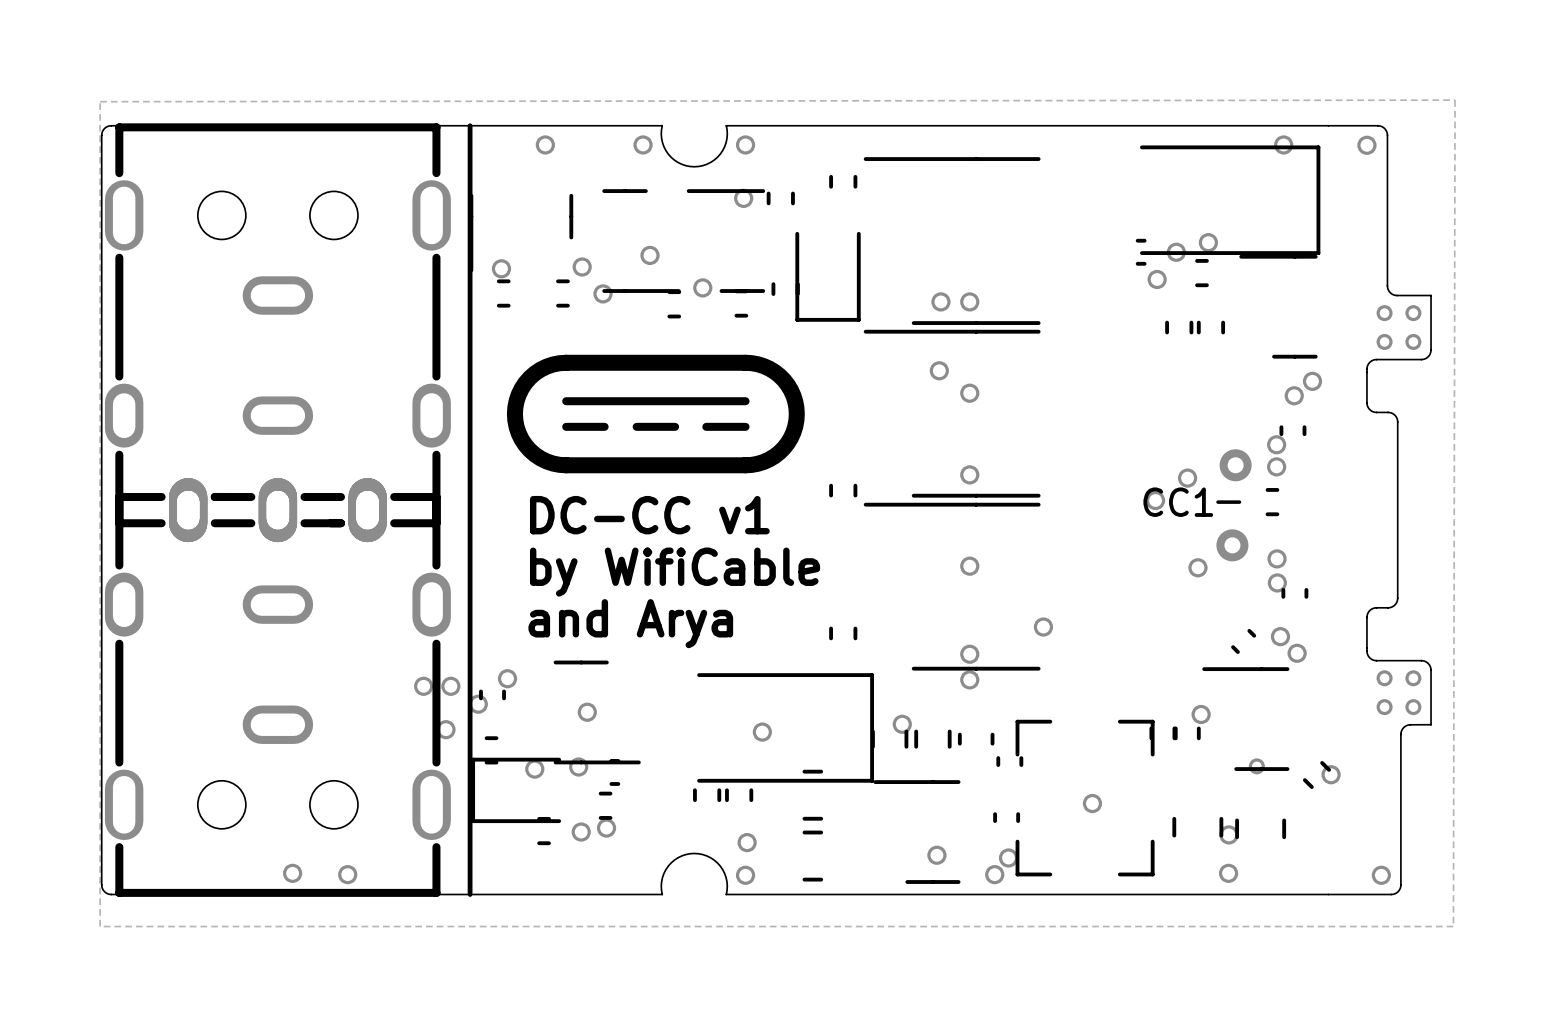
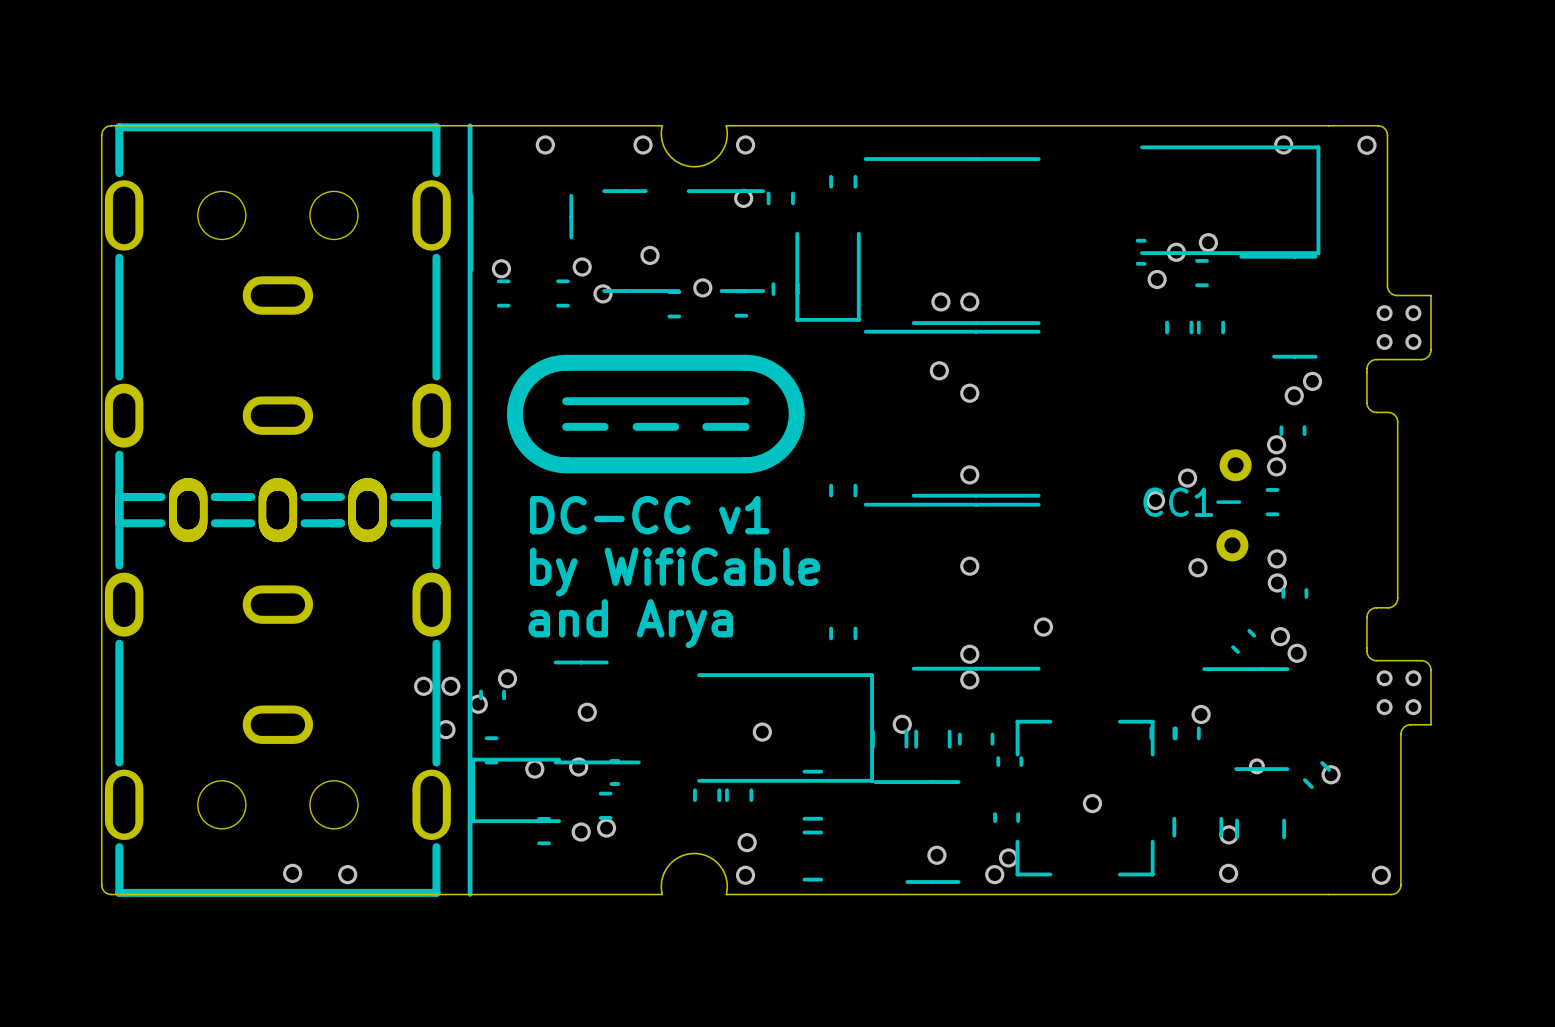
zone outline: (1455, 100) (100, 101) (100, 926) (1453, 926) (1455, 100) -> none

